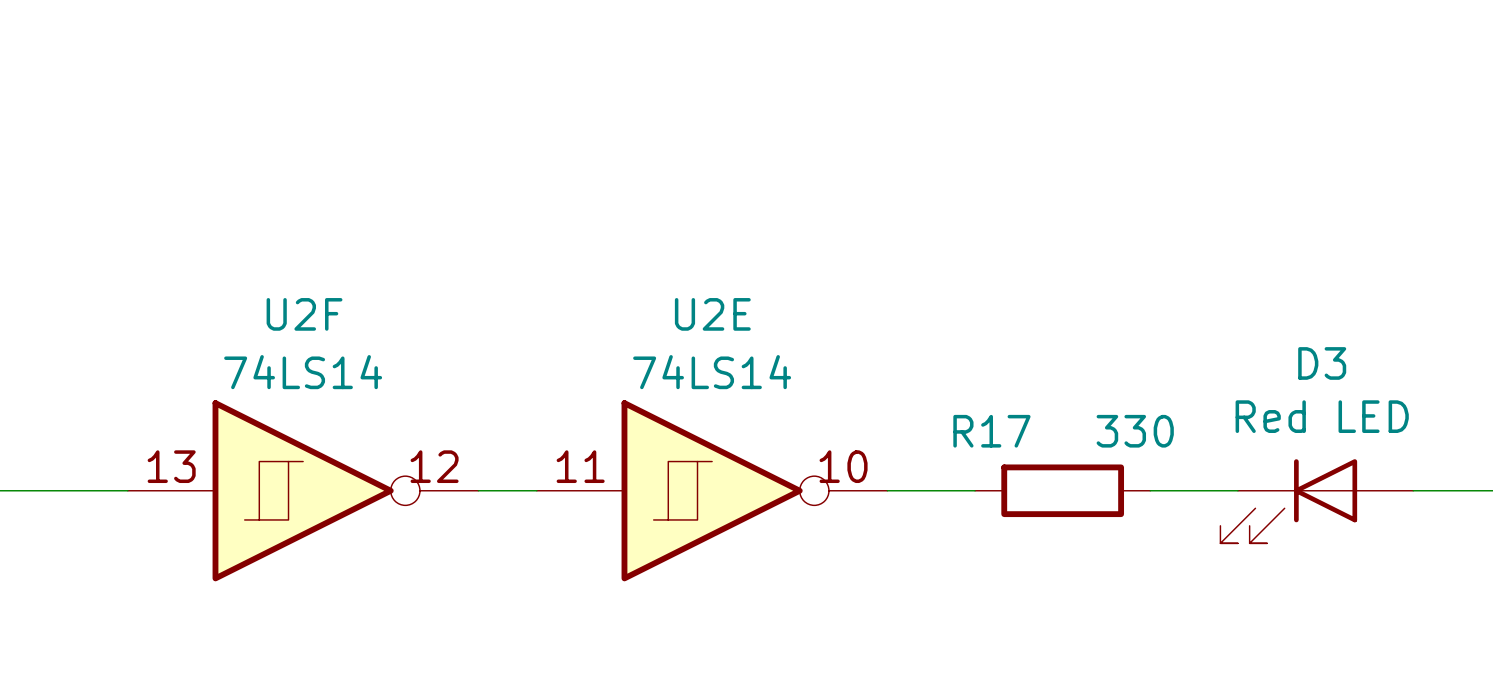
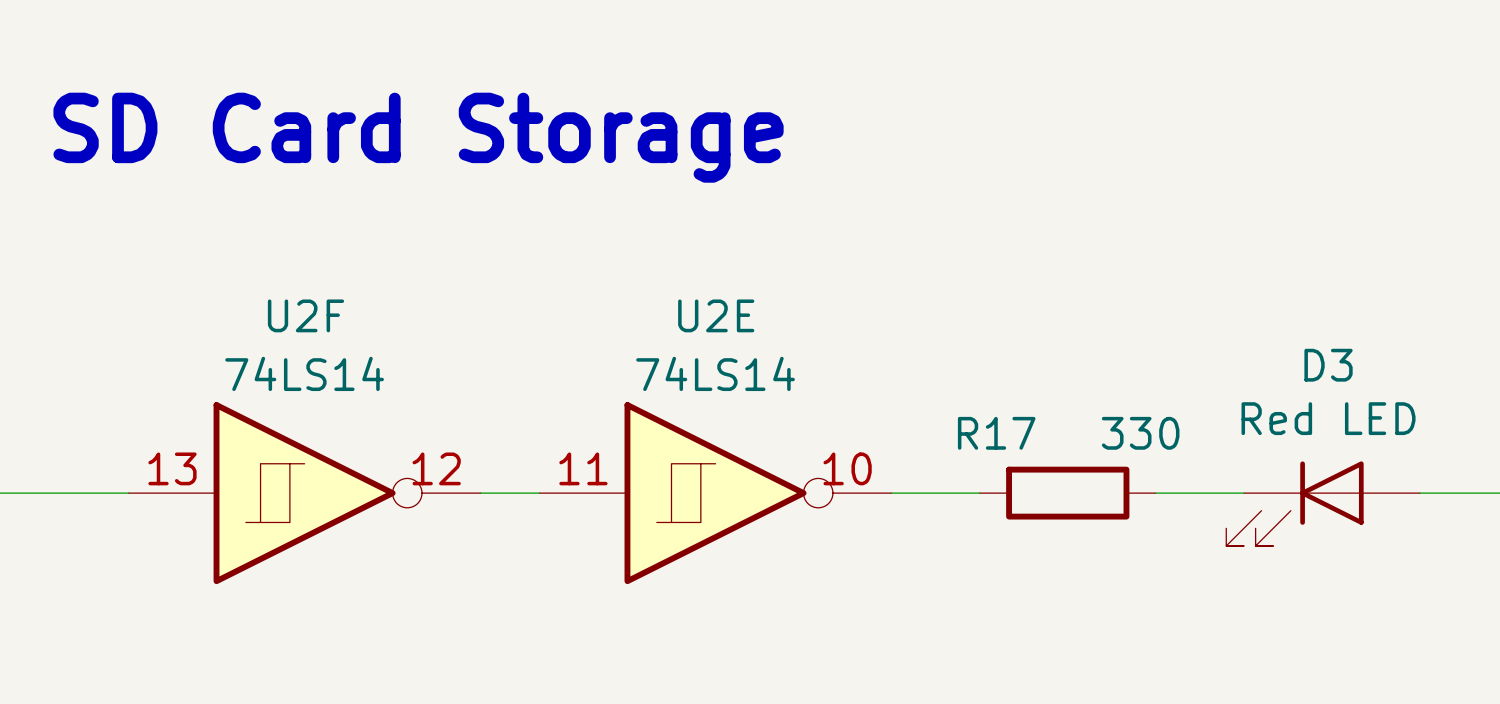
text: none -> SD Card Storage (418, 137)

